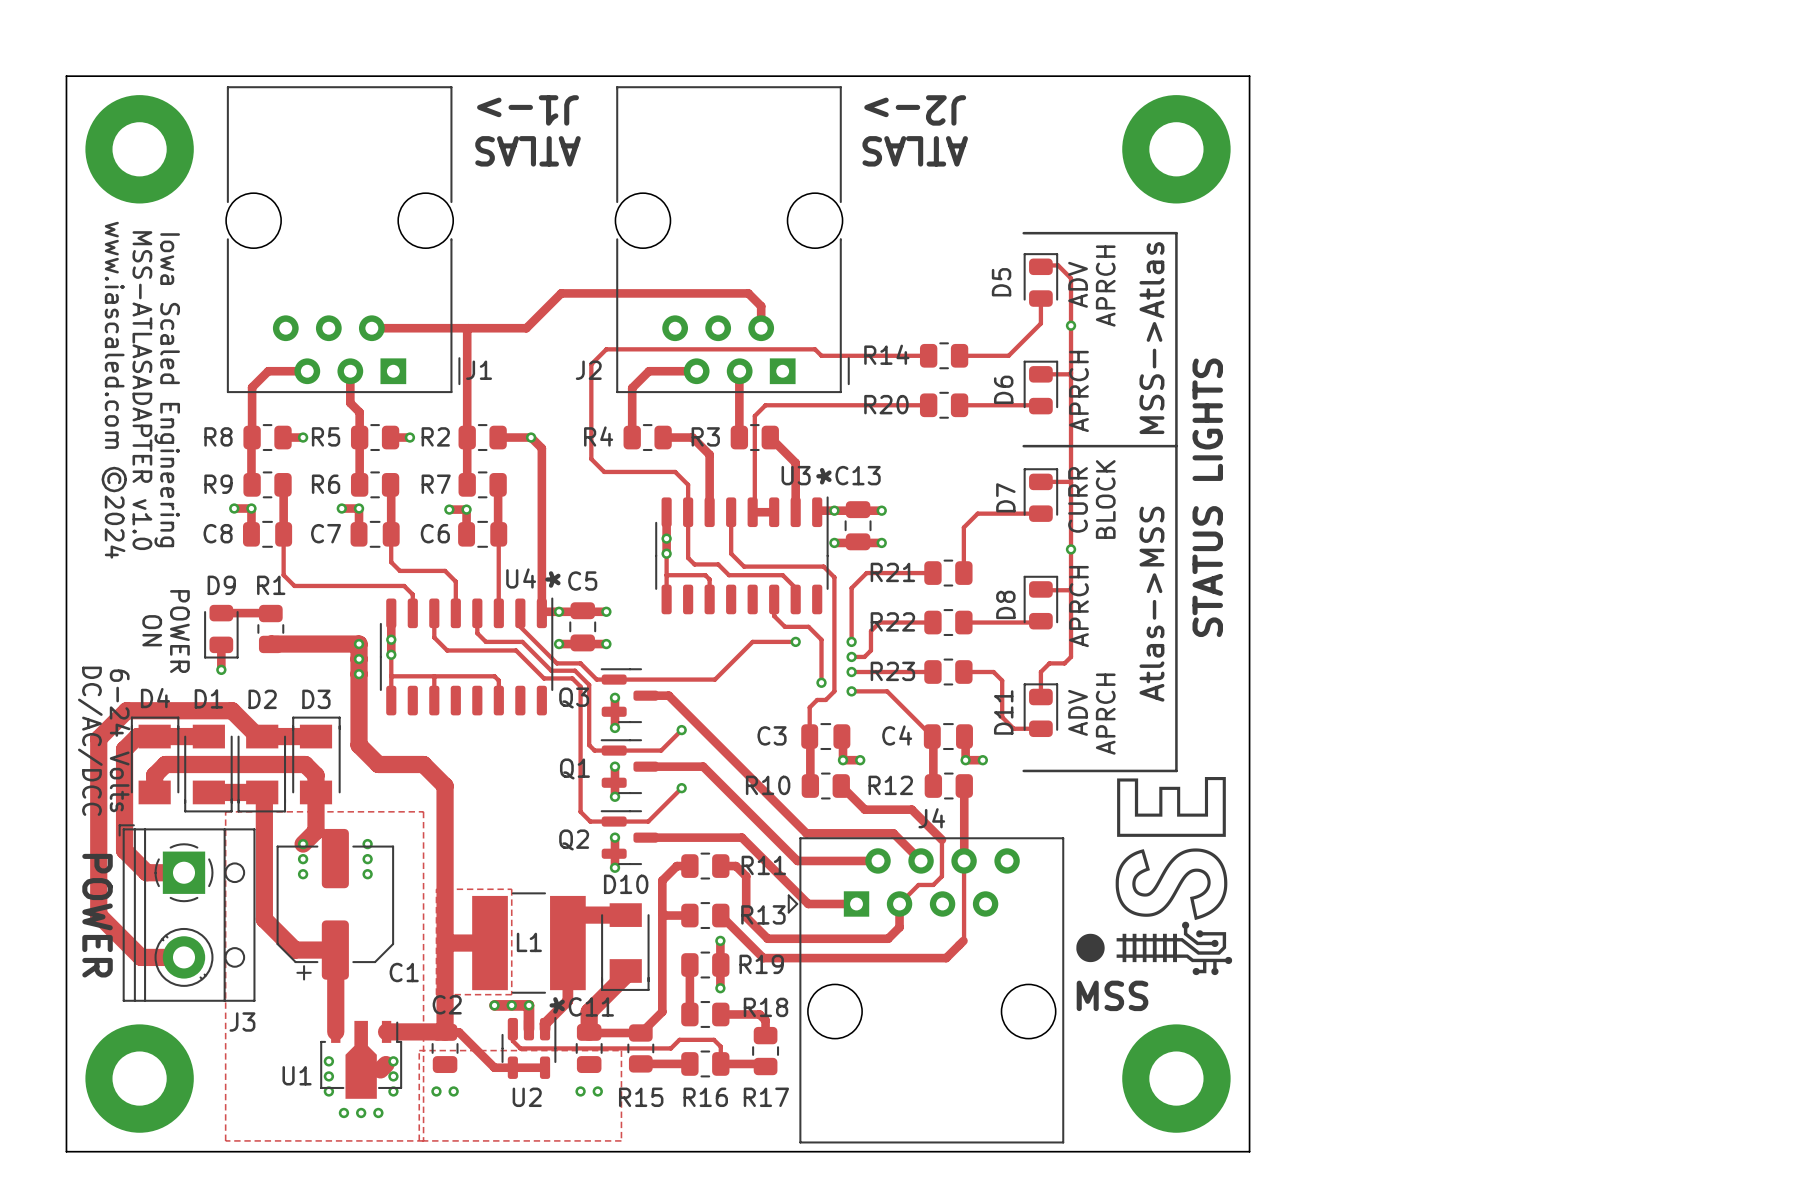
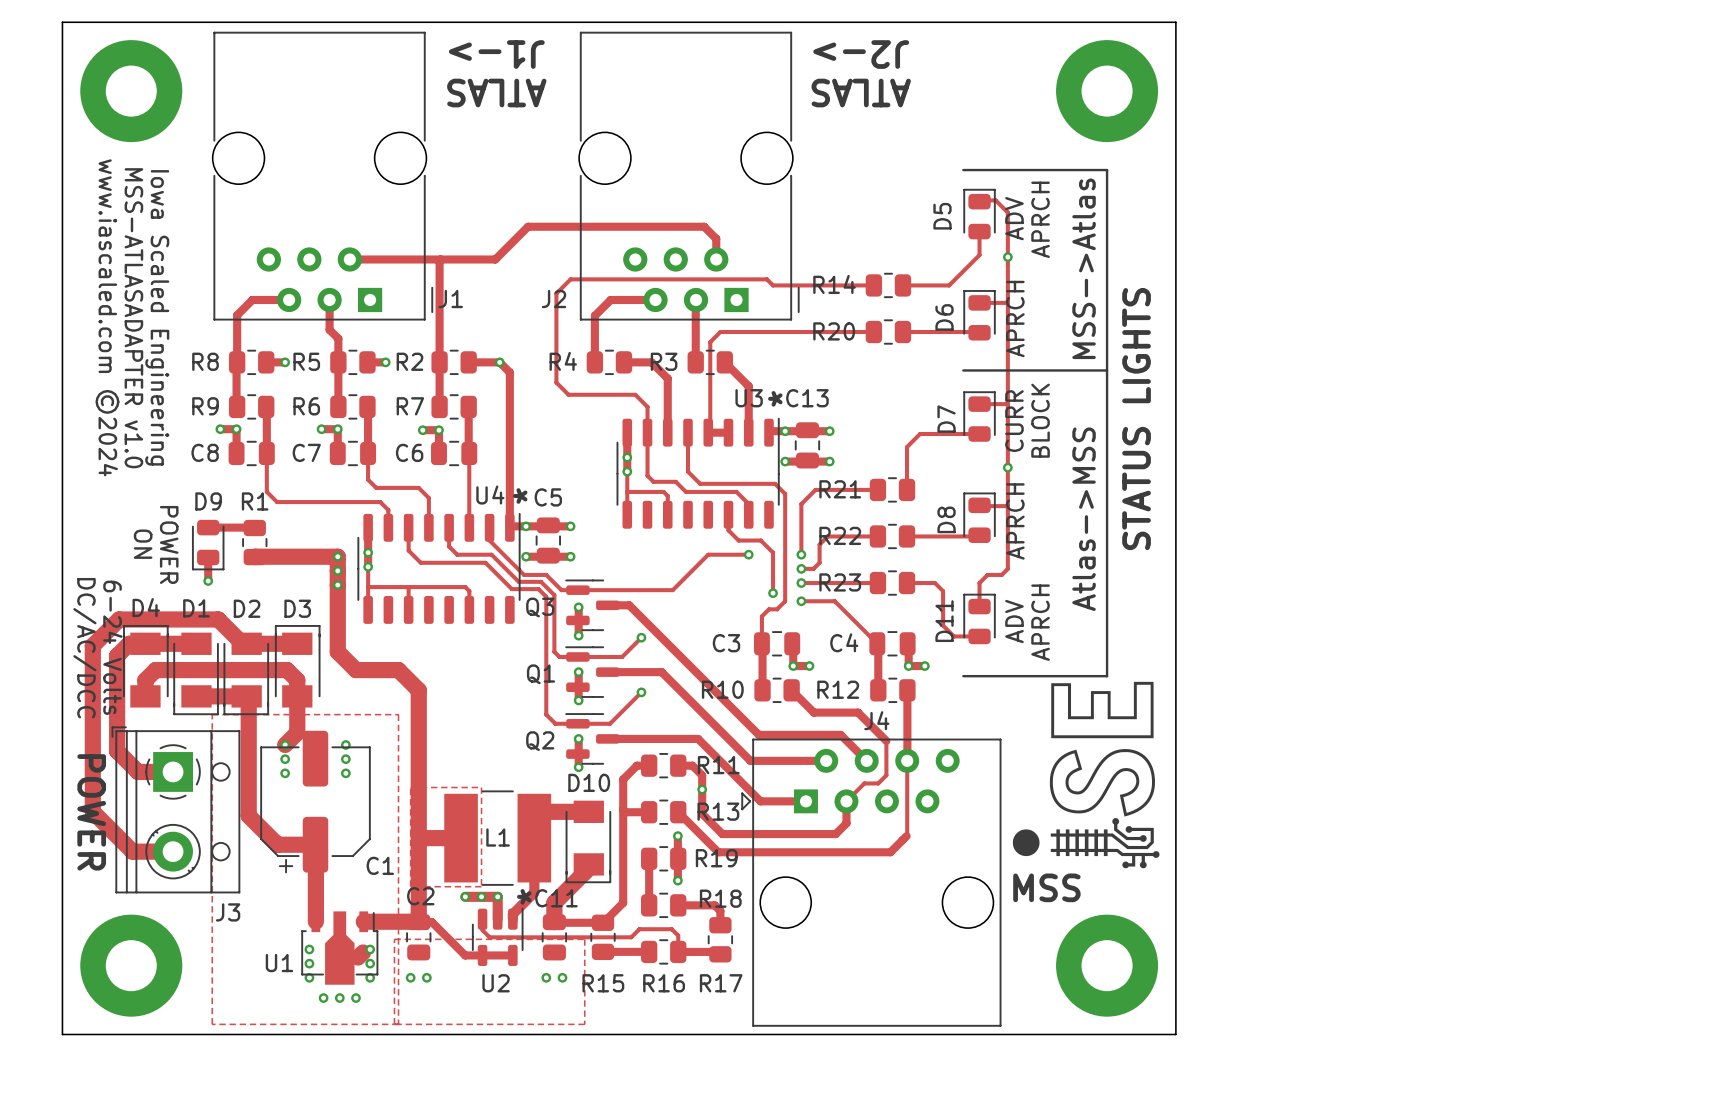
via: none -> (702, 789)

